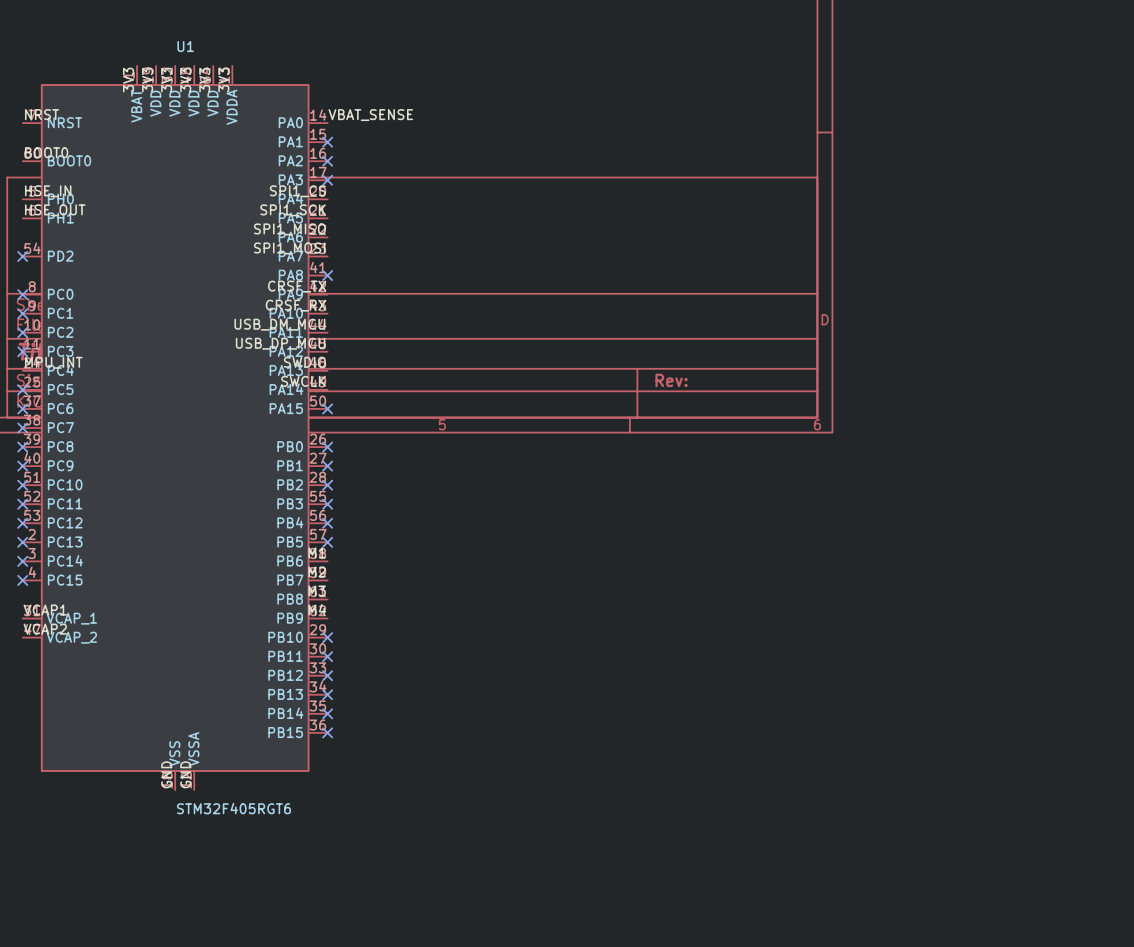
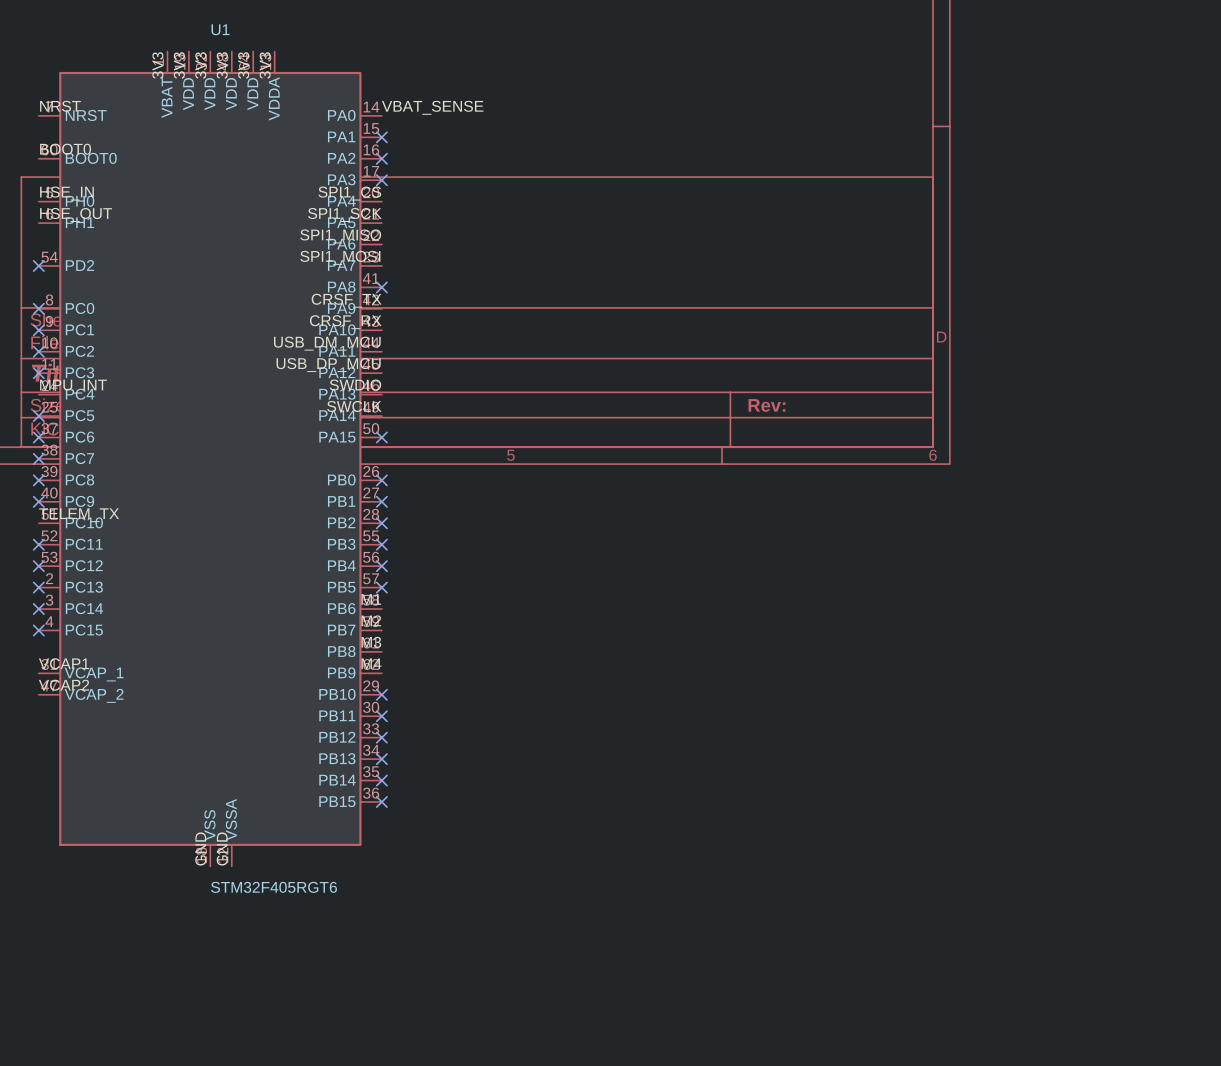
label: none -> TELEM_TX (79, 515)
no-connect mark: (22, 485) -> none

